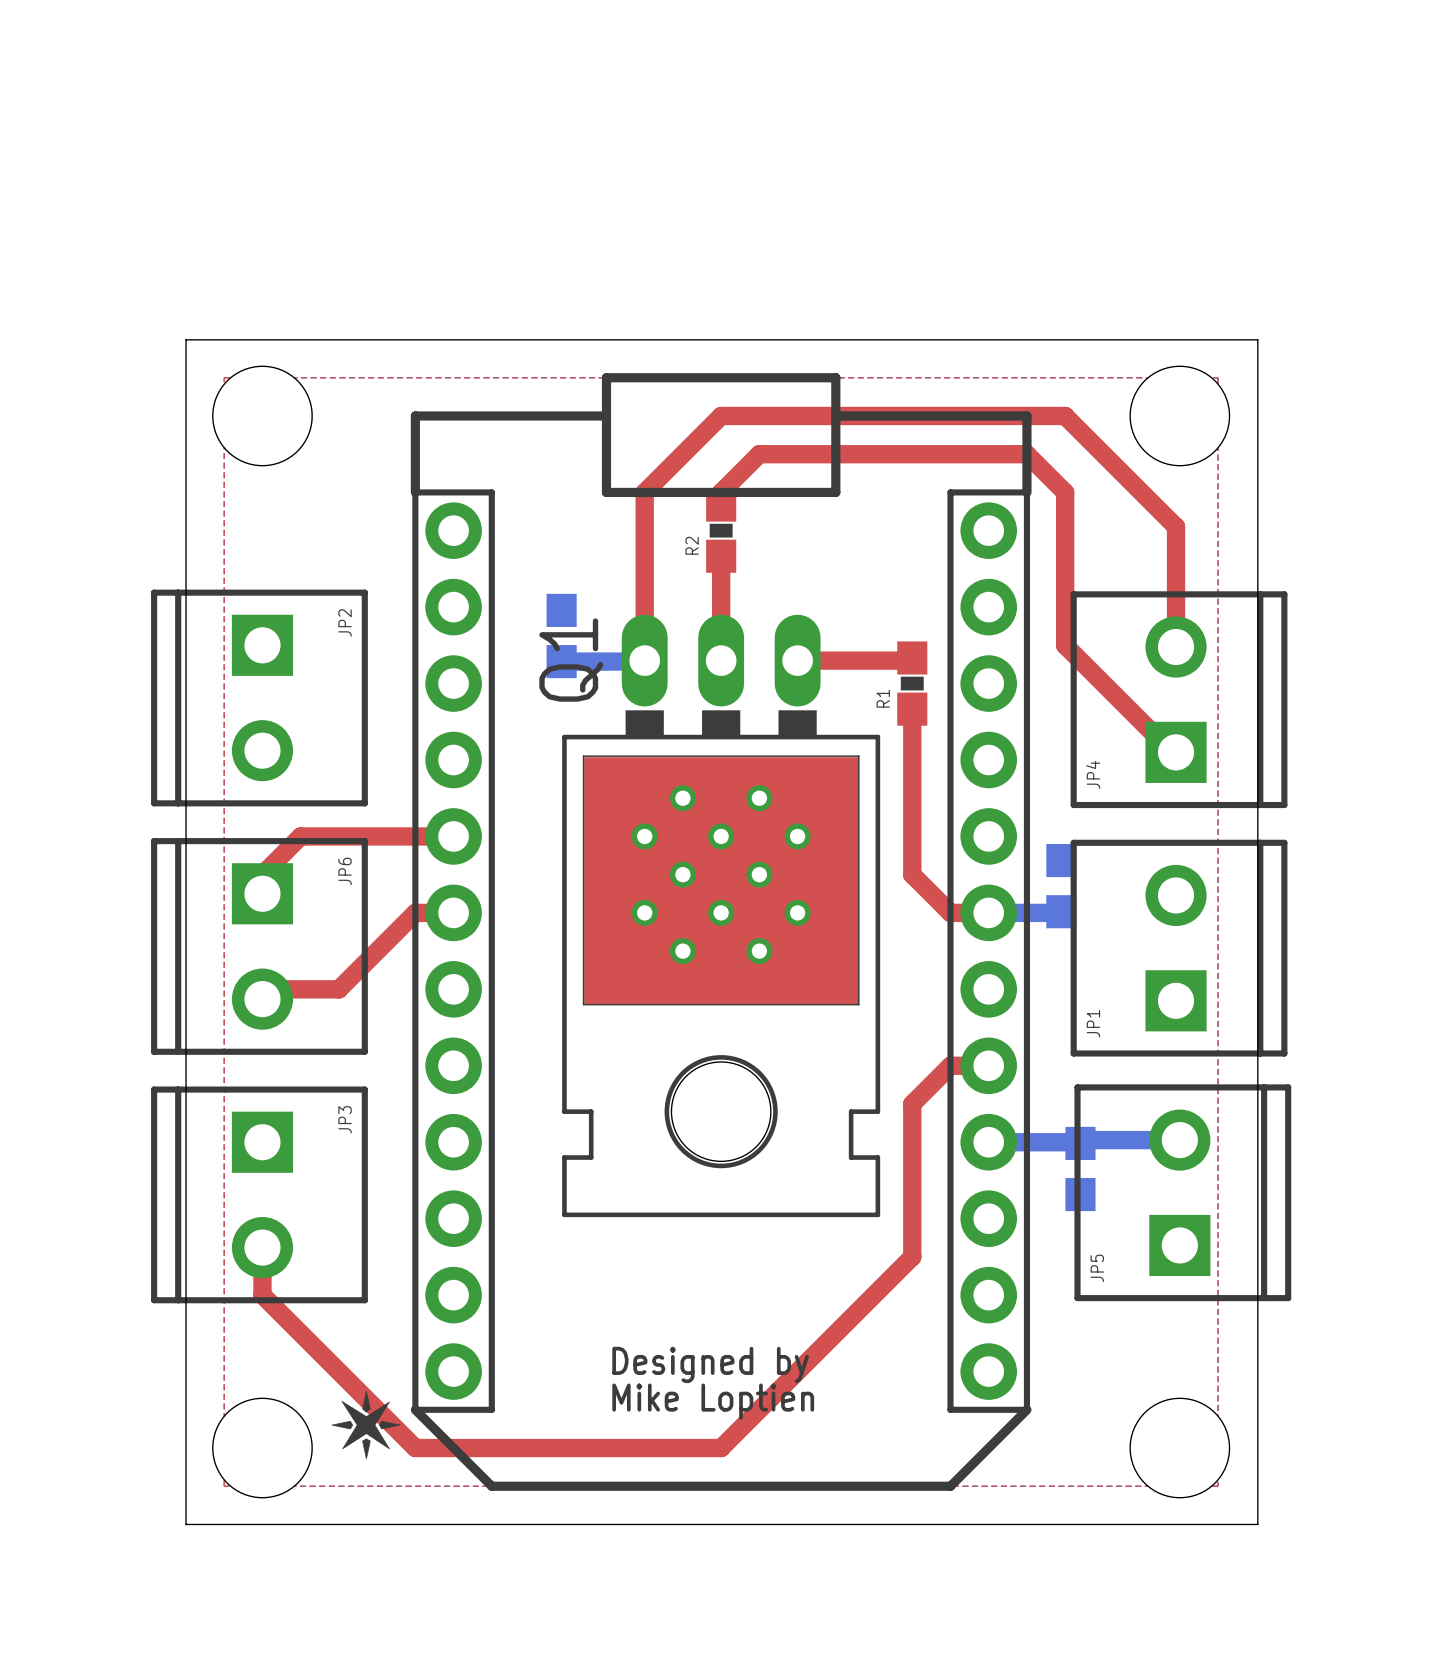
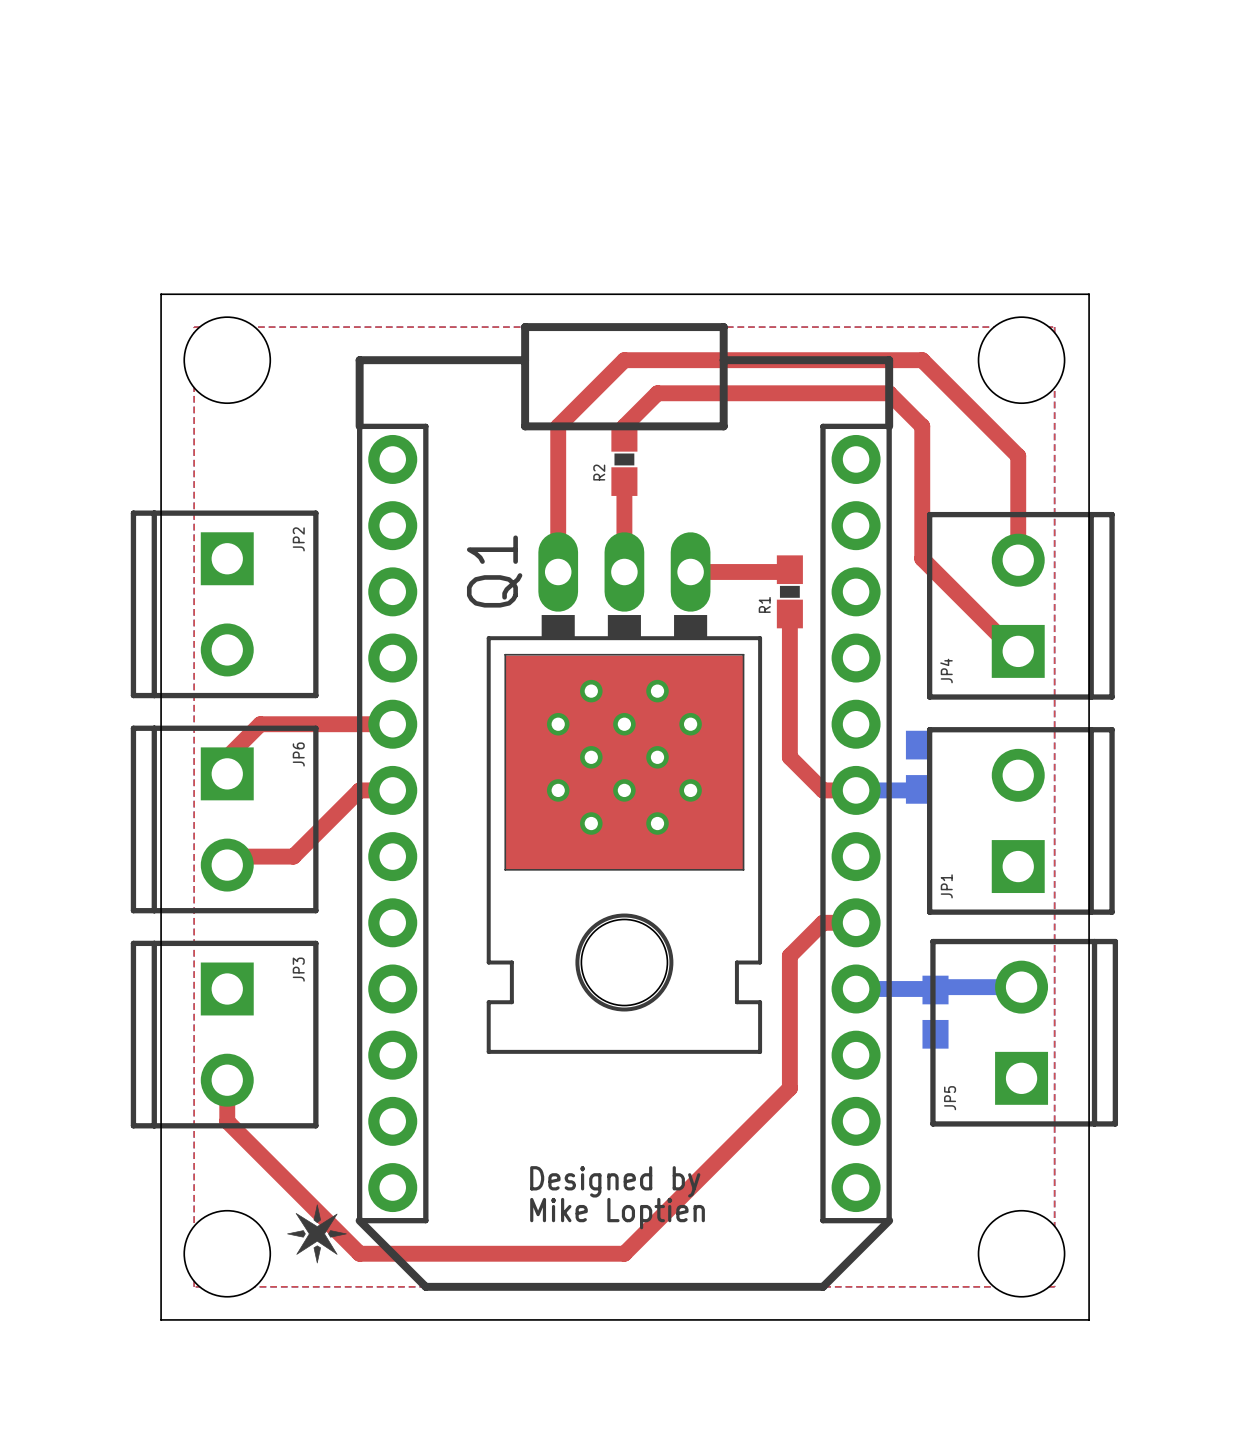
part: (561, 636) -> none
bottom track: (644, 660) (561, 661) -> none

